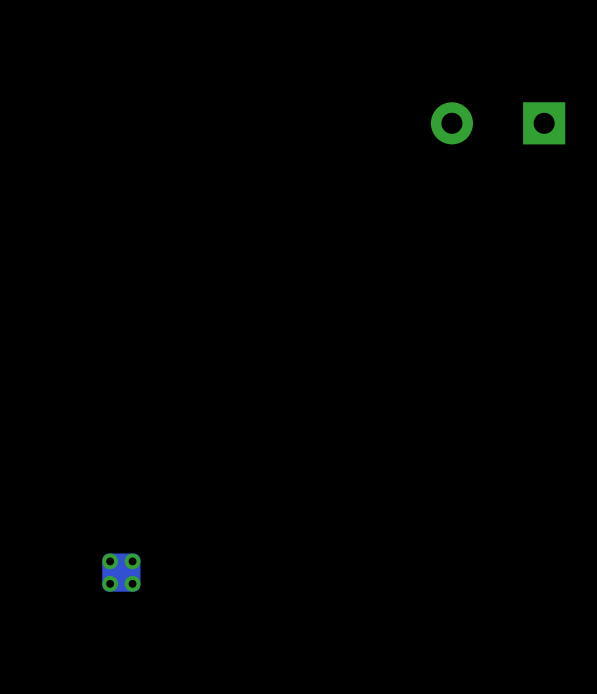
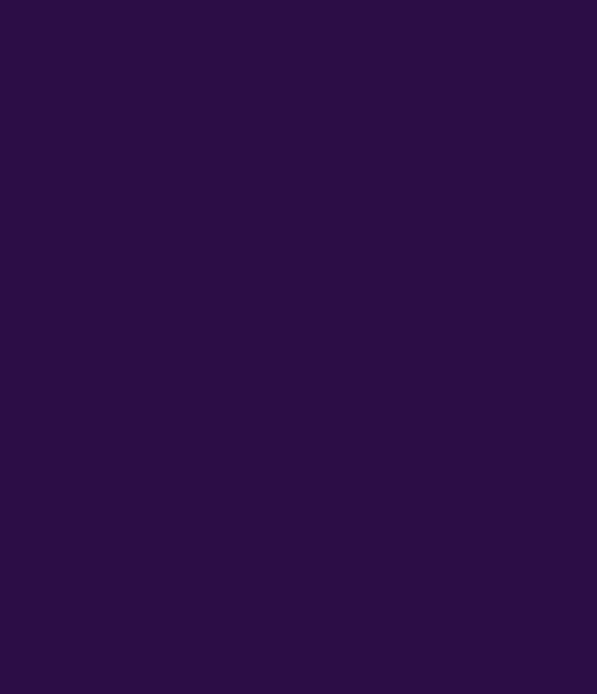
part: (498, 123) -> none
part: (121, 572) -> none

